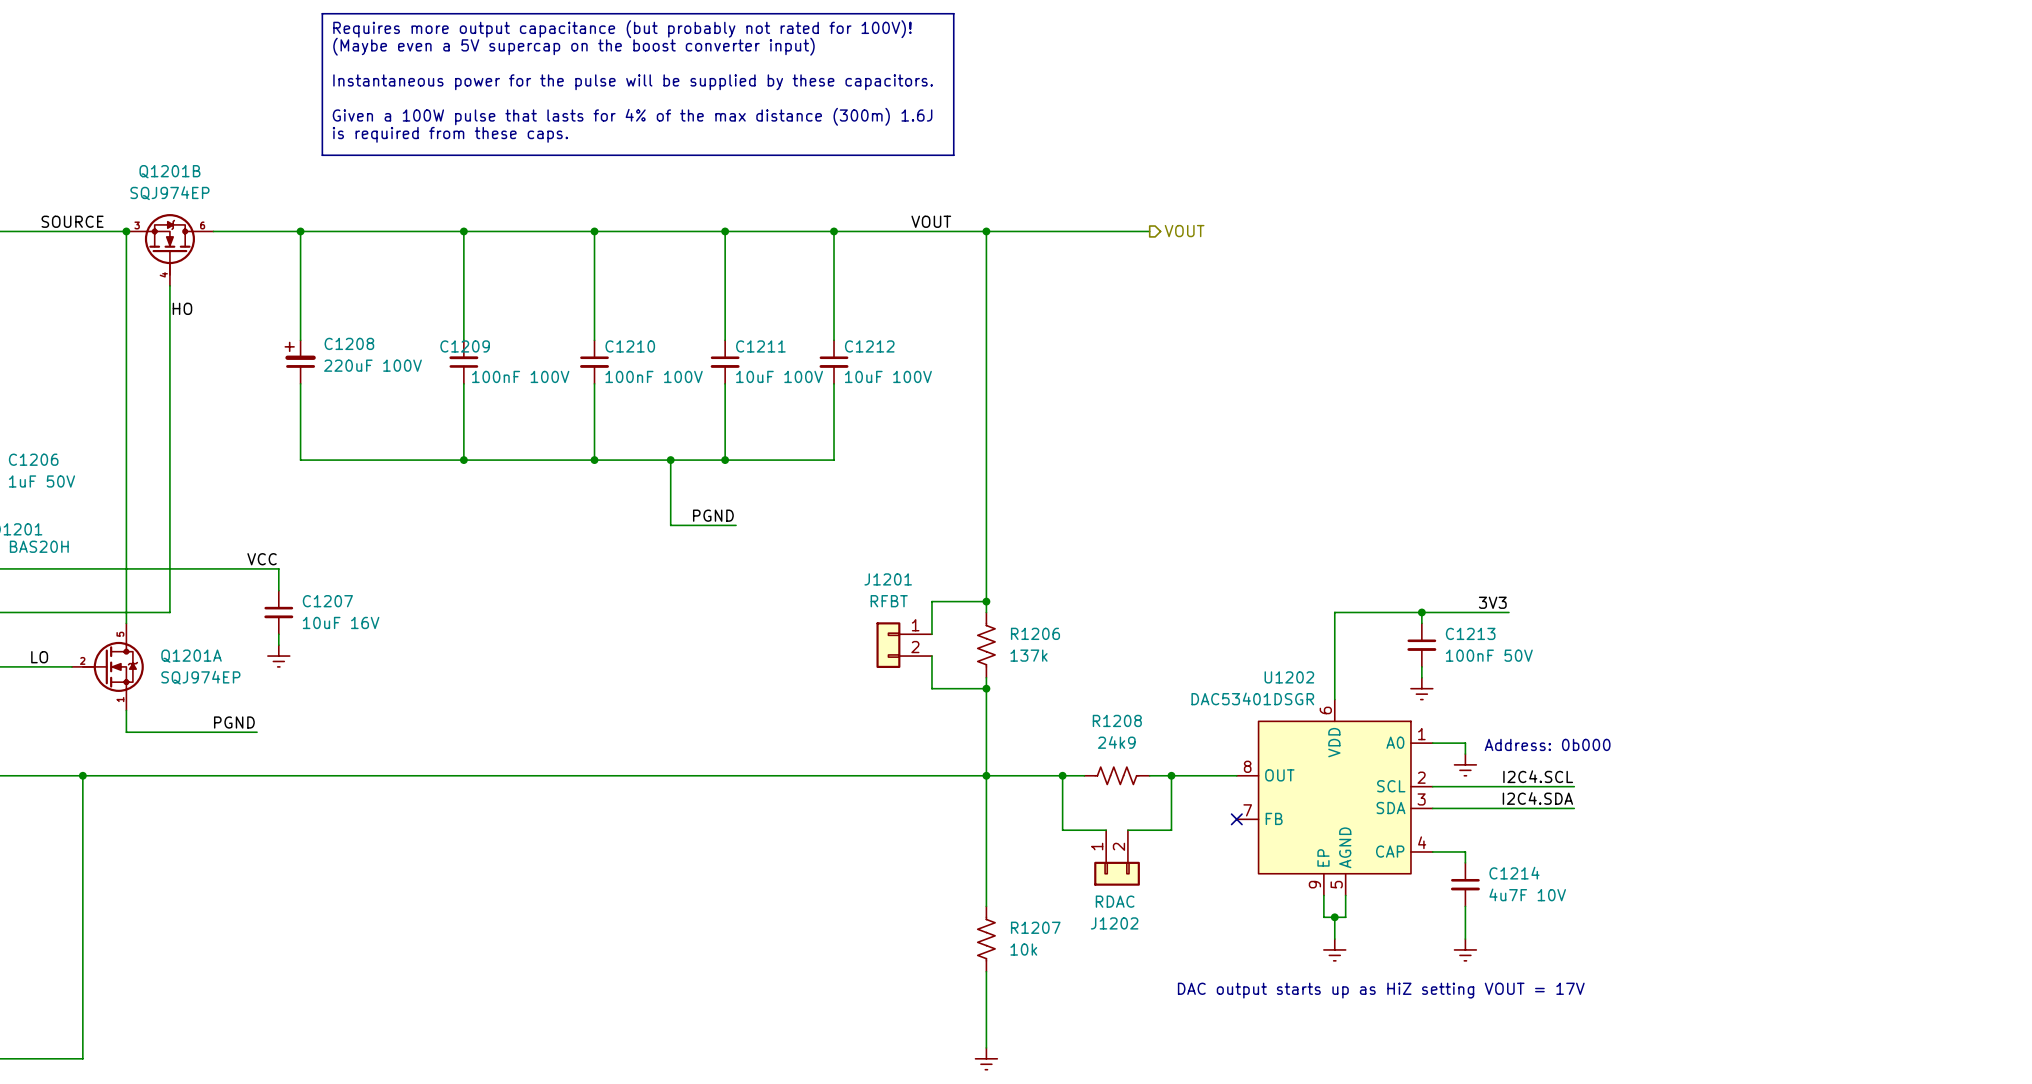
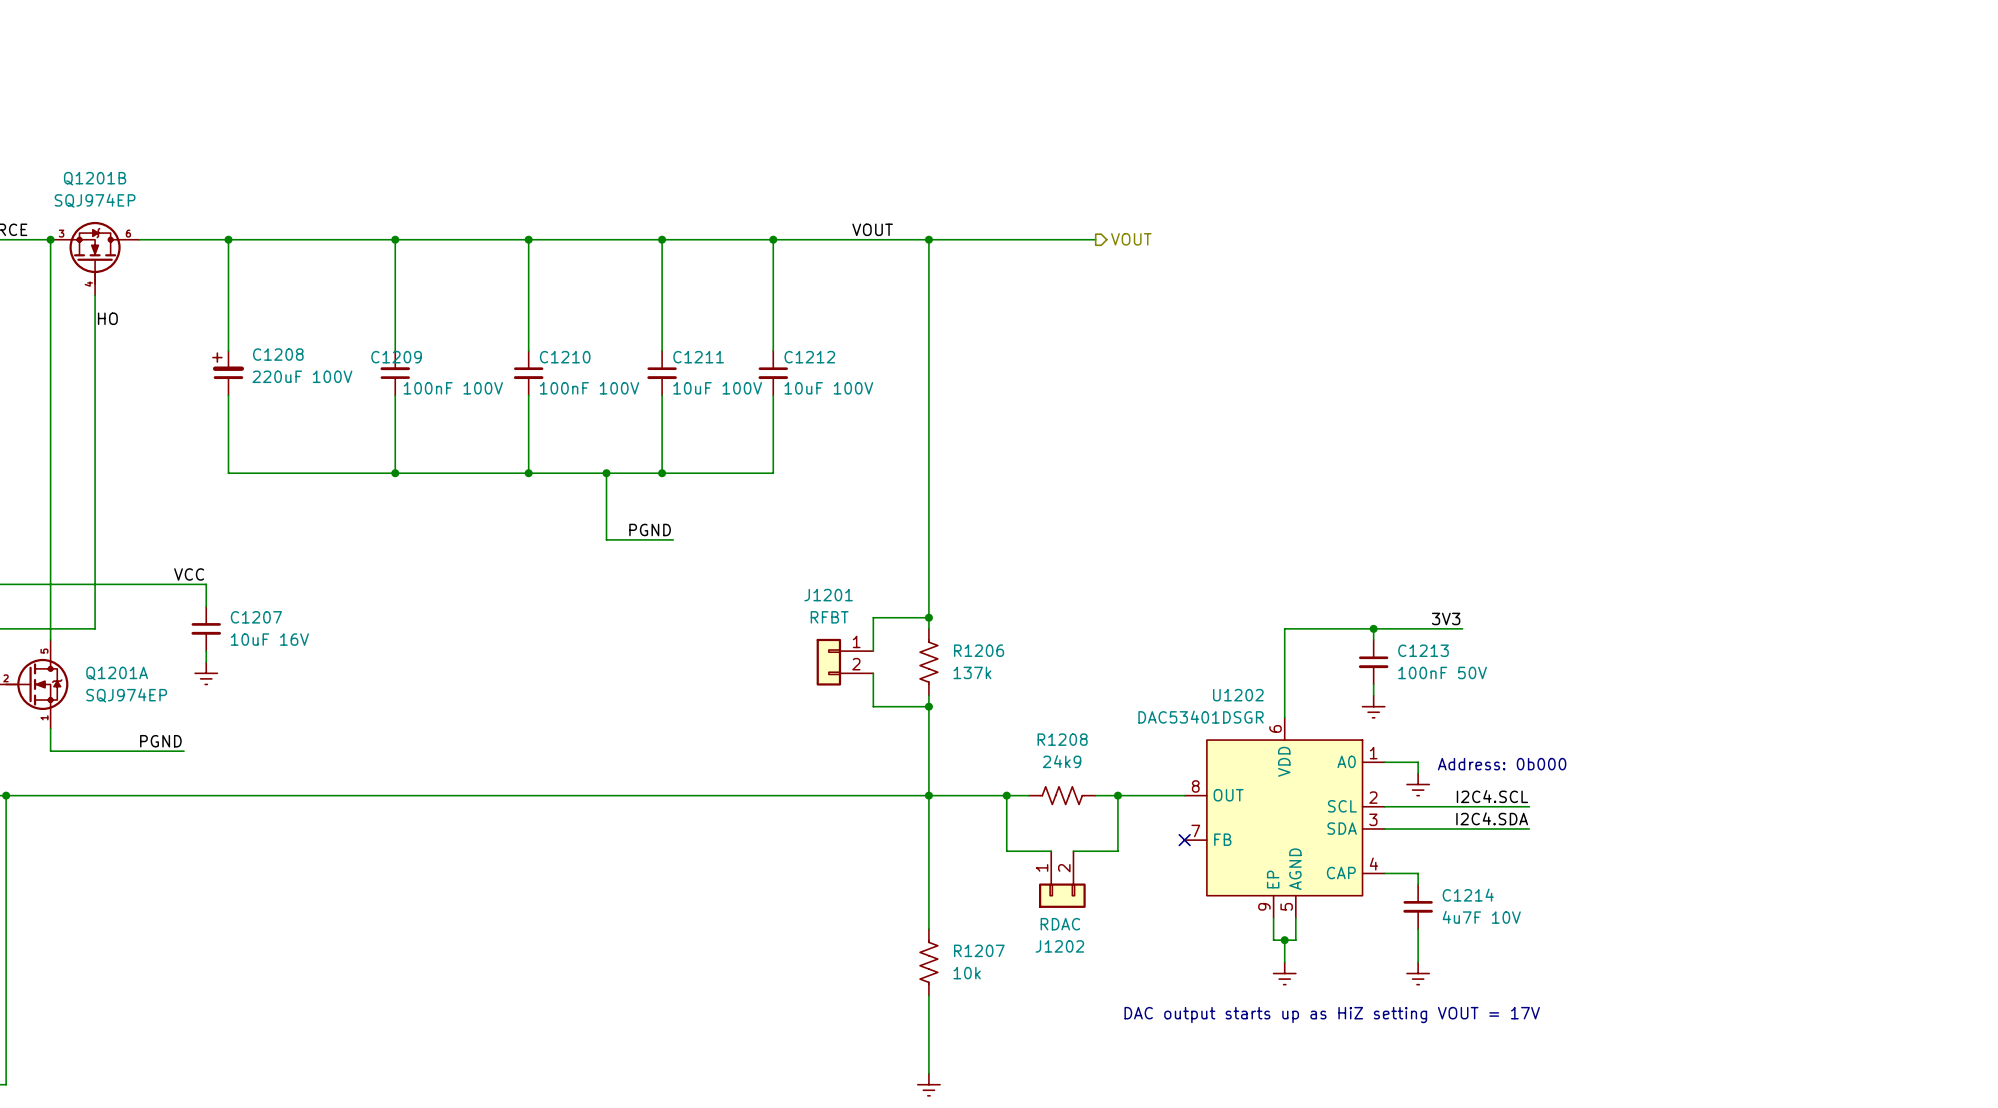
line: (322, 13) (953, 13) (953, 155) (322, 155) (322, 13) -> none
text: Requires more output capacitance (but probably not rated for 100V)! (622, 29) -> none
text: (Maybe even a 5V supercap on the boost converter input) (573, 46) -> none
text: Instantaneous power for the pulse will be supplied by these capacitors. (633, 82) -> none
text: Given a 100W pulse that lasts for 4% of the max distance (300m) 1.6J (632, 116) -> none
text: is required from these caps. (450, 134) -> none

